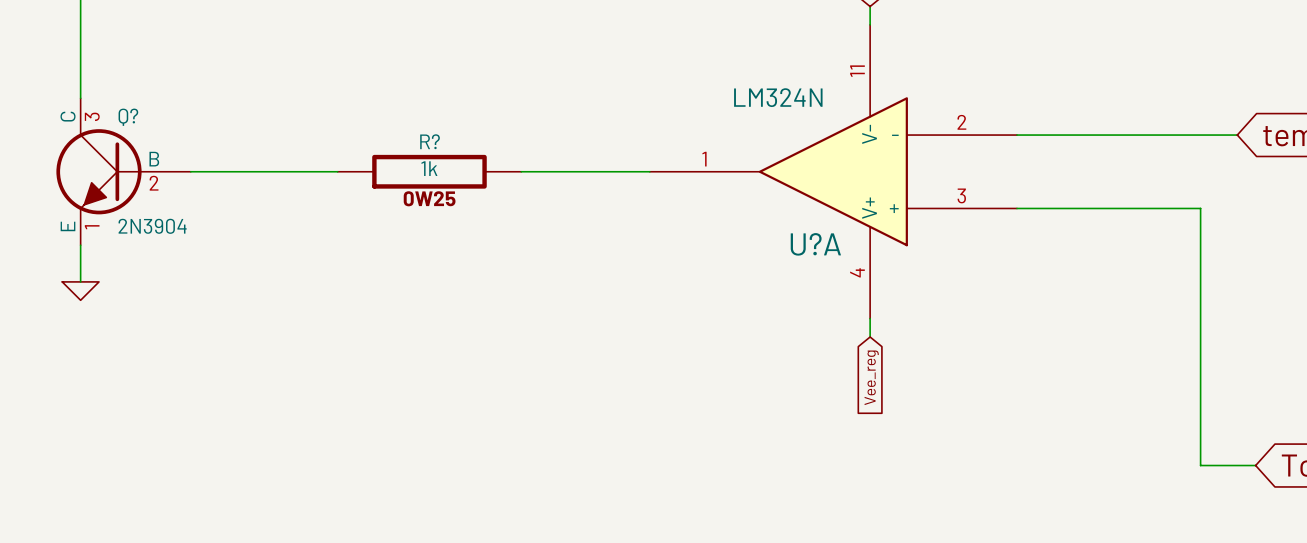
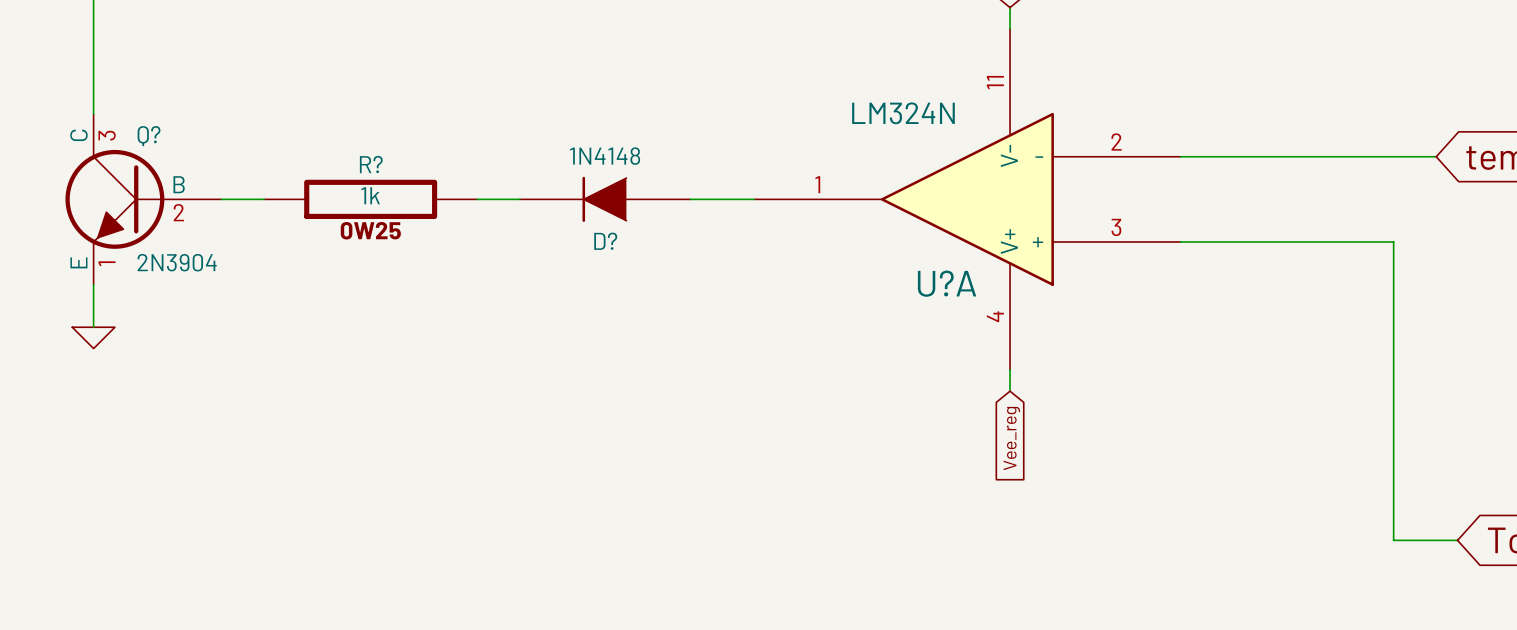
wire: (227, 171) (337, 171) -> none
wire: none -> (477, 199) (519, 199)
R? position: (429, 171) -> (370, 199)
D?: none -> 1N4148 (605, 199)

